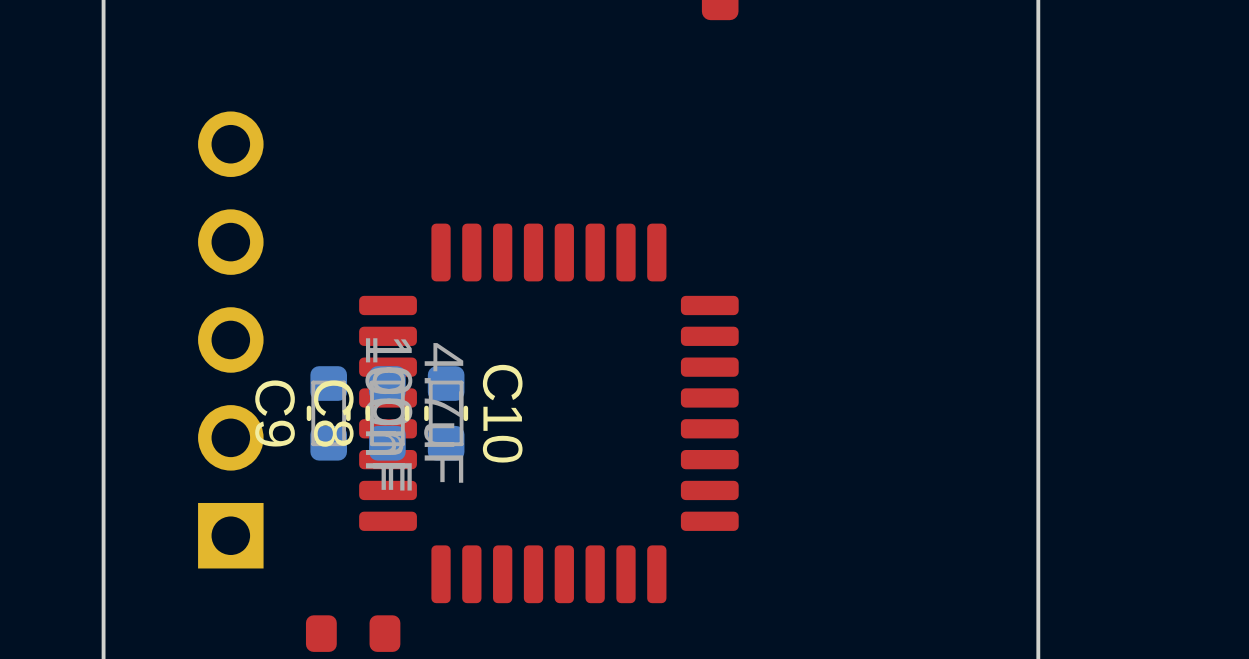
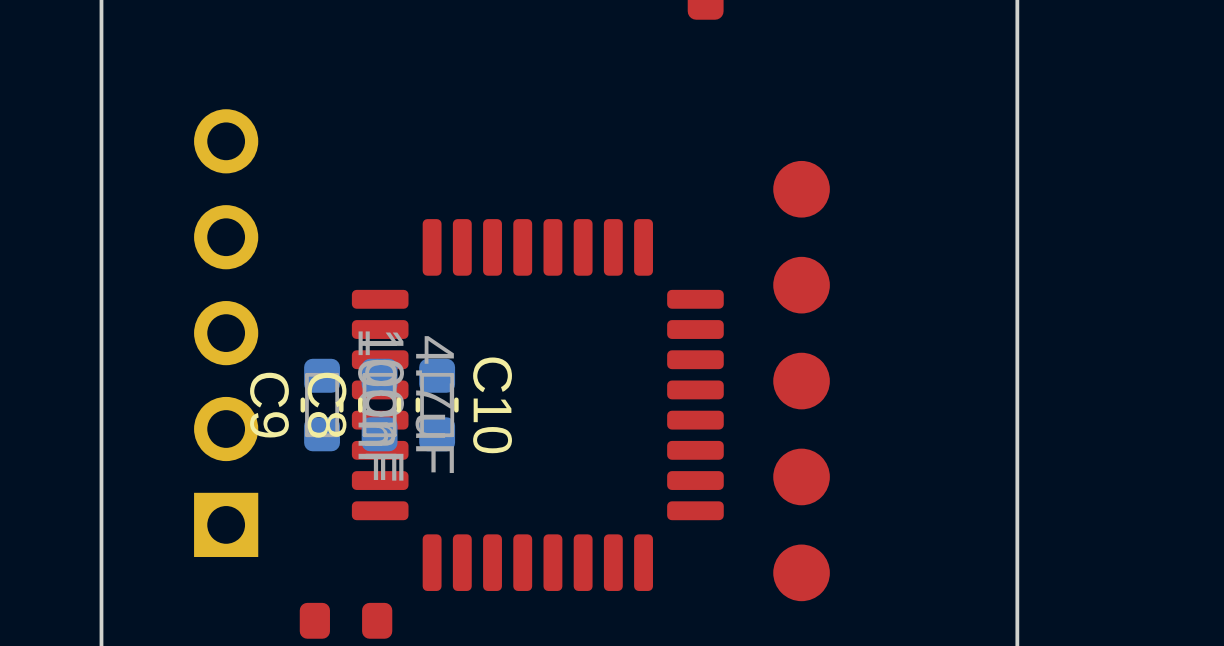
part: none -> (801, 189)
part: none -> (801, 285)
part: none -> (801, 381)
part: none -> (801, 476)
part: none -> (801, 572)

